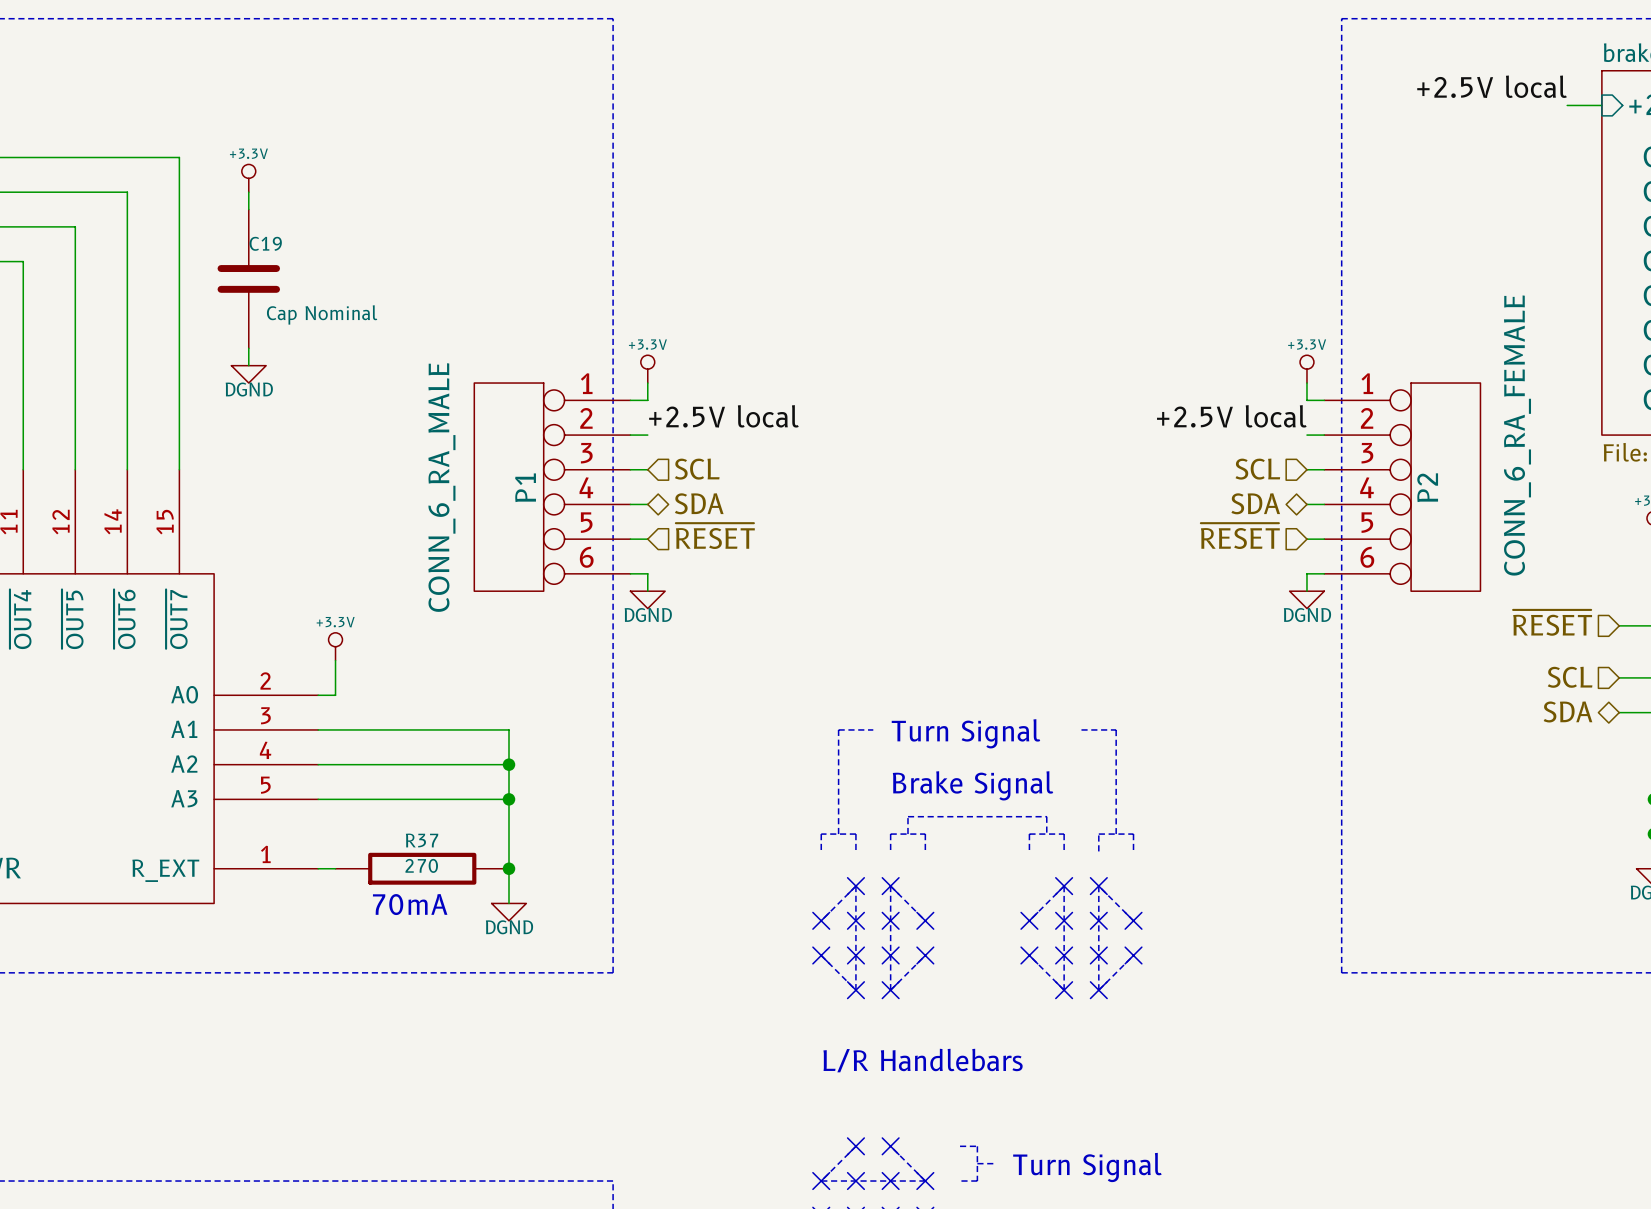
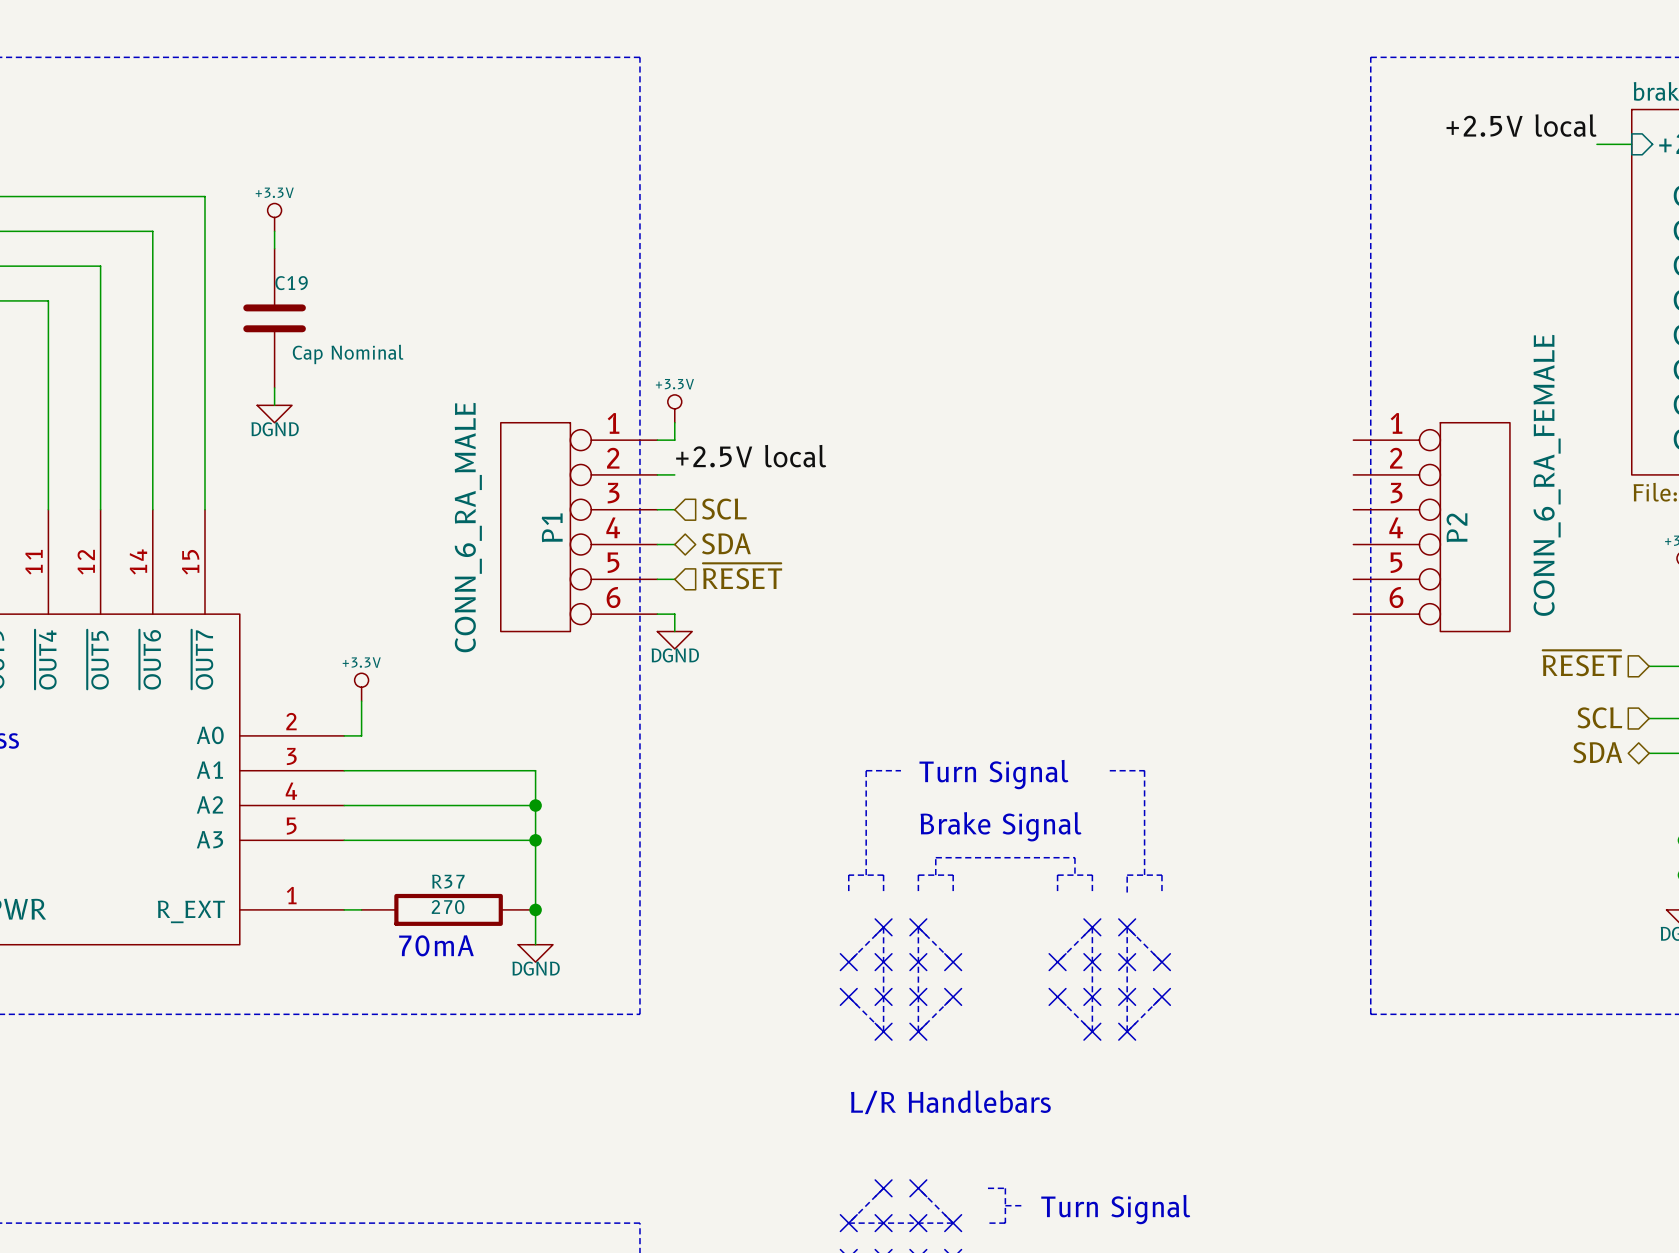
power symbol: +3.3V (1306, 369) -> none
wire: (1306, 383) (1306, 400) (1324, 400) -> none
label: +2.5V local (1231, 416) -> none
wire: (1306, 435) (1324, 435) -> none
hierarchical label: SCL (1257, 469) -> none
wire: (1306, 469) (1324, 469) -> none
hierarchical label: SDA (1255, 503) -> none
wire: (1306, 504) (1324, 504) -> none
hierarchical label: ~{RESET} (1240, 536) -> none
wire: (1306, 539) (1324, 539) -> none
wire: (1324, 573) (1306, 573) (1306, 591) -> none
power symbol: DGND (1306, 599) -> none

